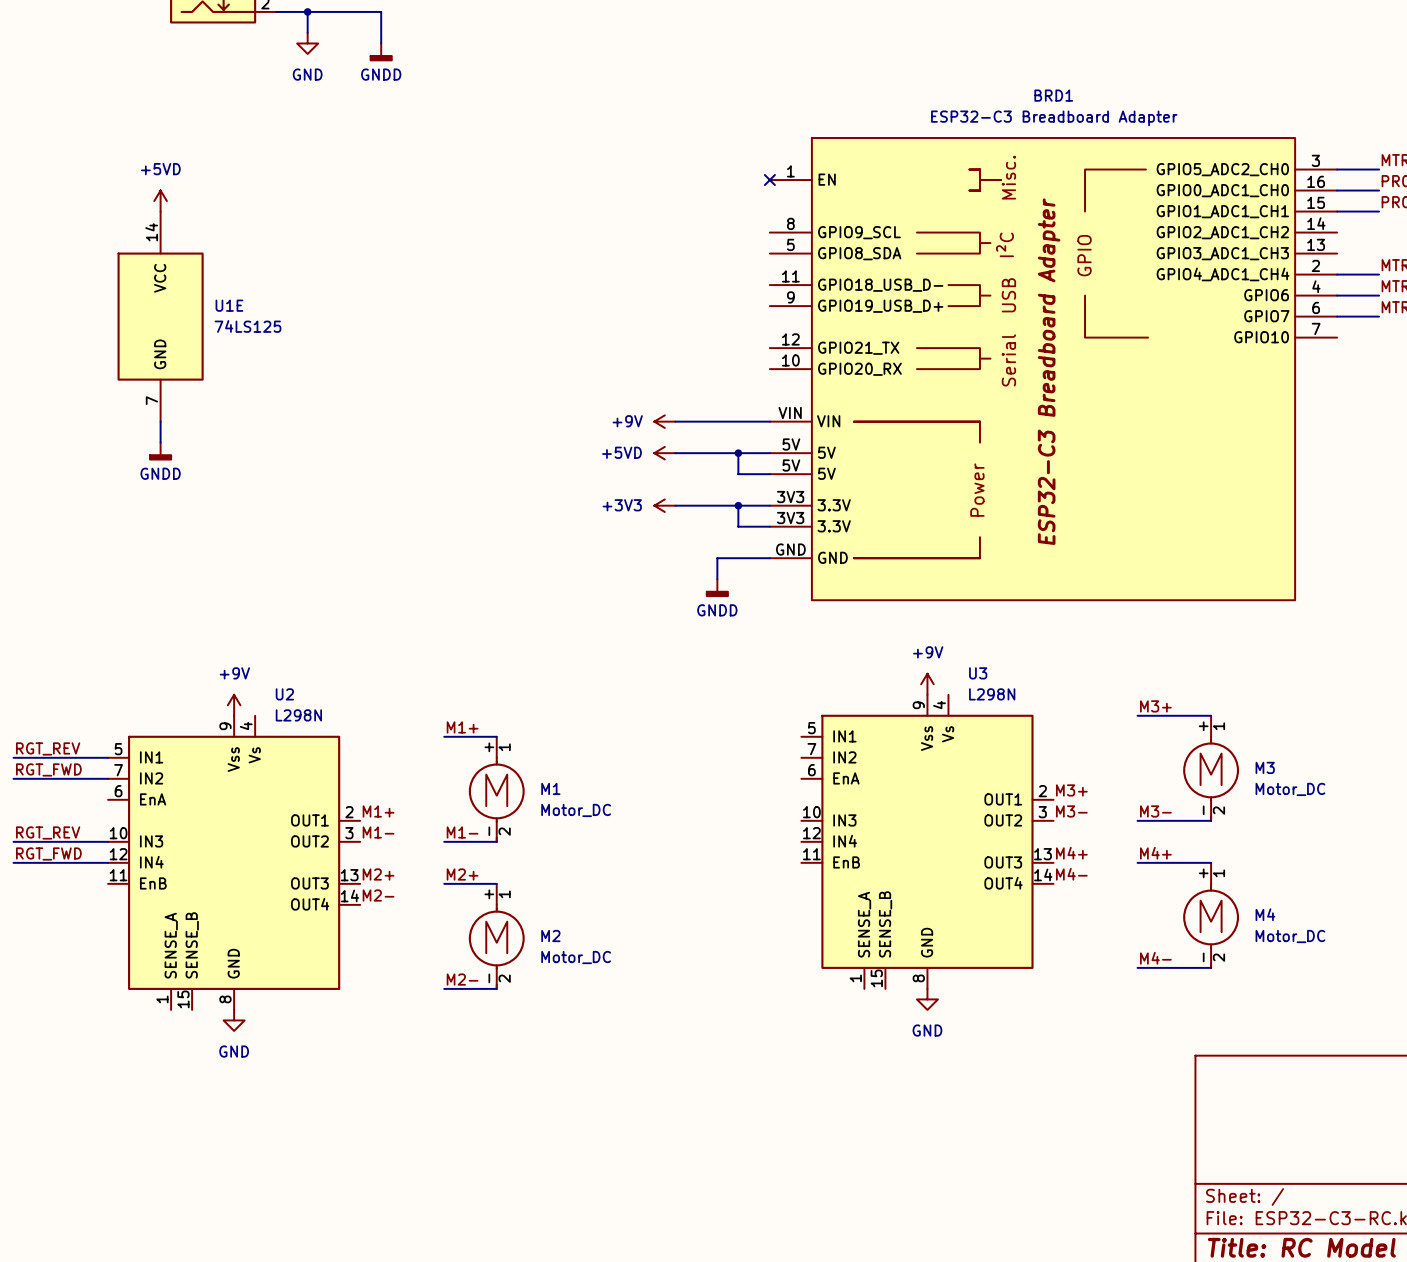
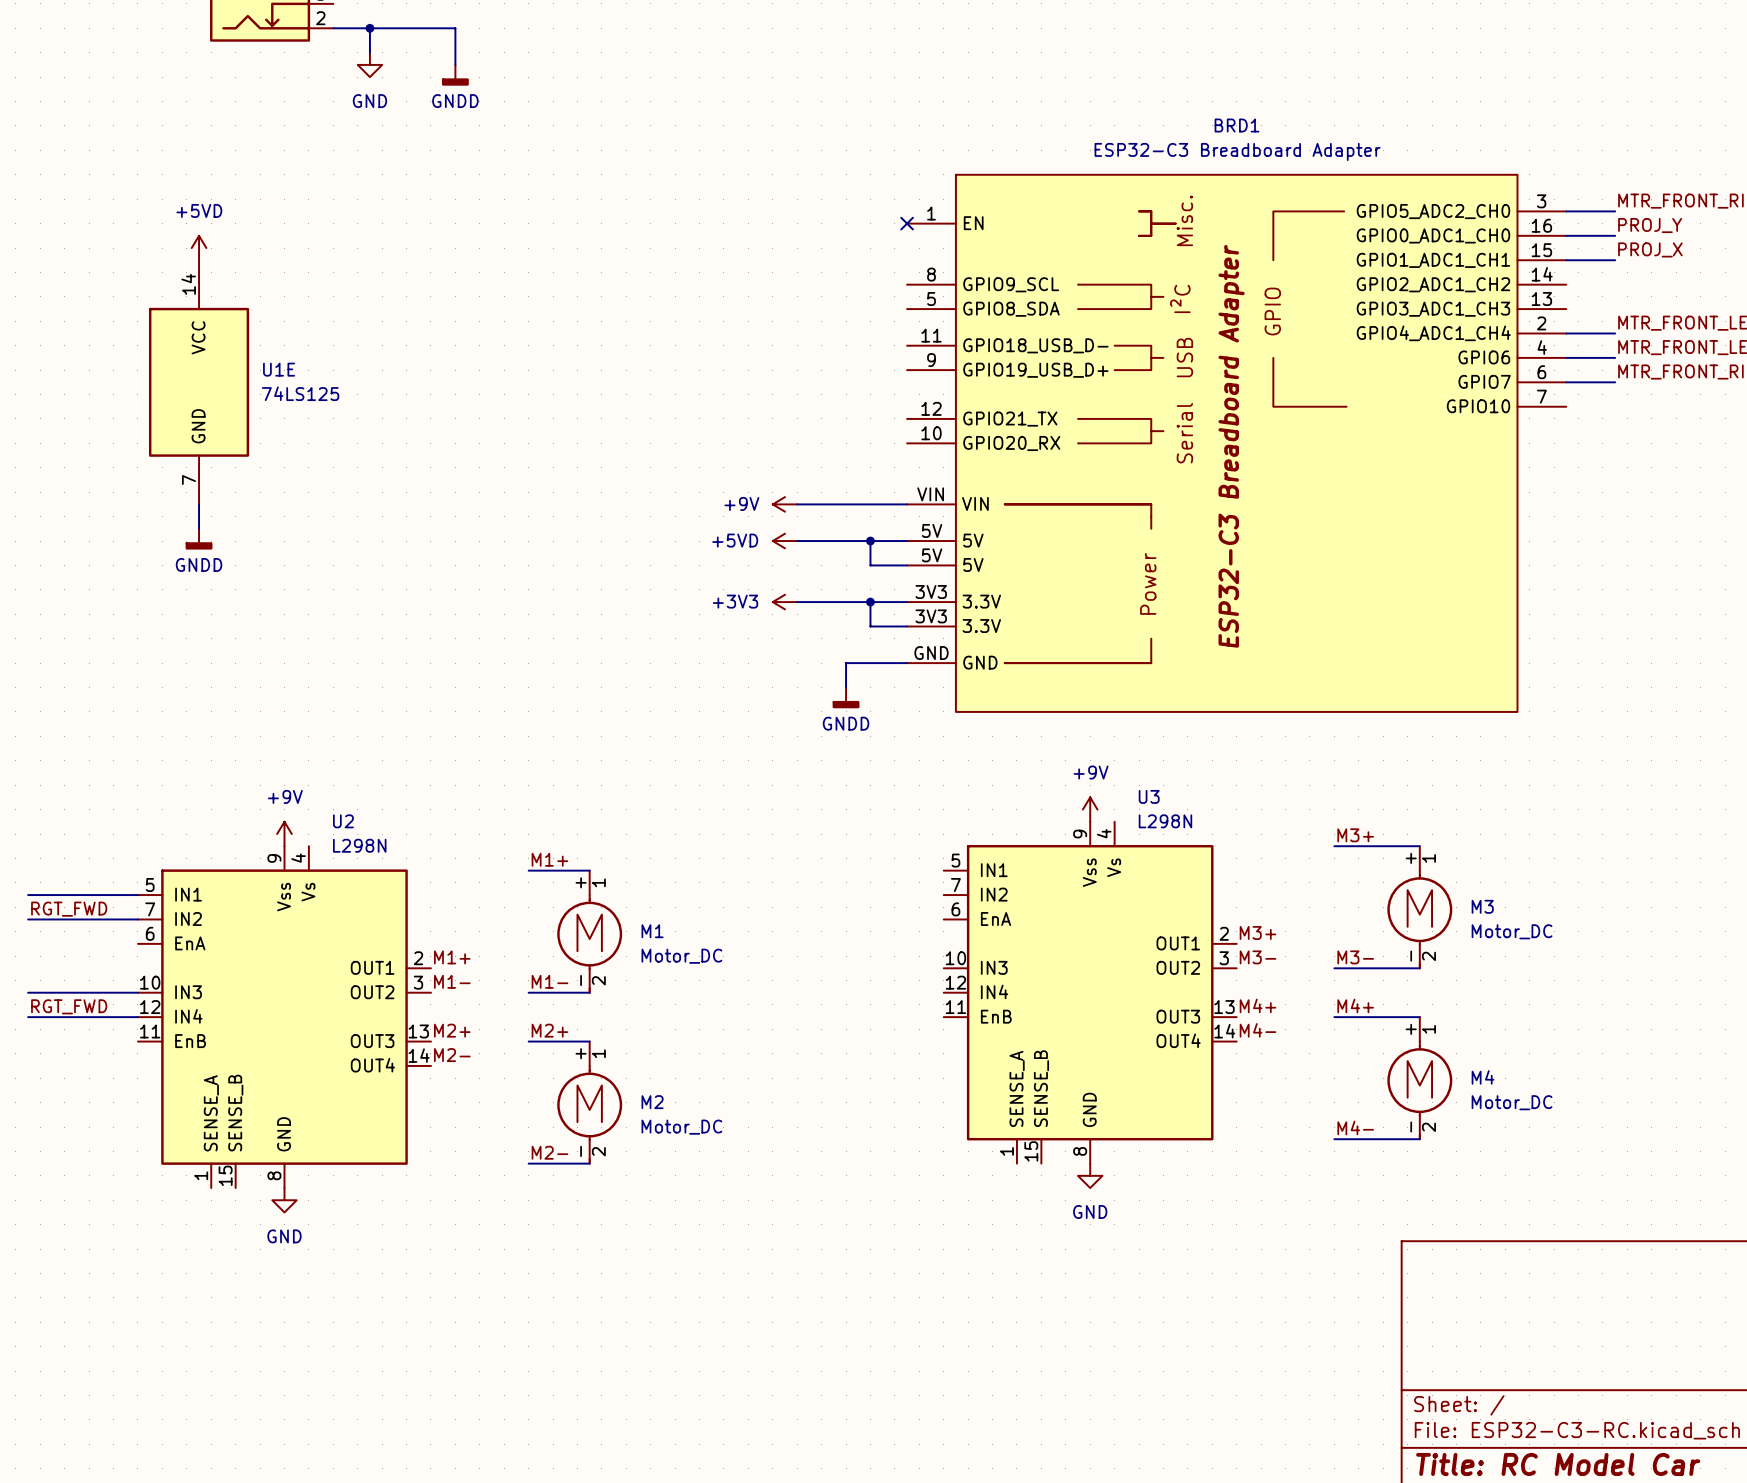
label: RGT_REV (48, 748) -> none
label: RGT_REV (48, 832) -> none

